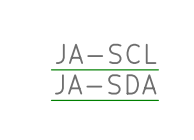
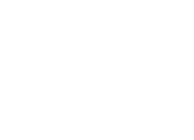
label: JA-SCL (106, 53) -> none
wire: (51, 69) (158, 69) -> none
label: JA-SDA (105, 84) -> none
wire: (51, 100) (158, 100) -> none

